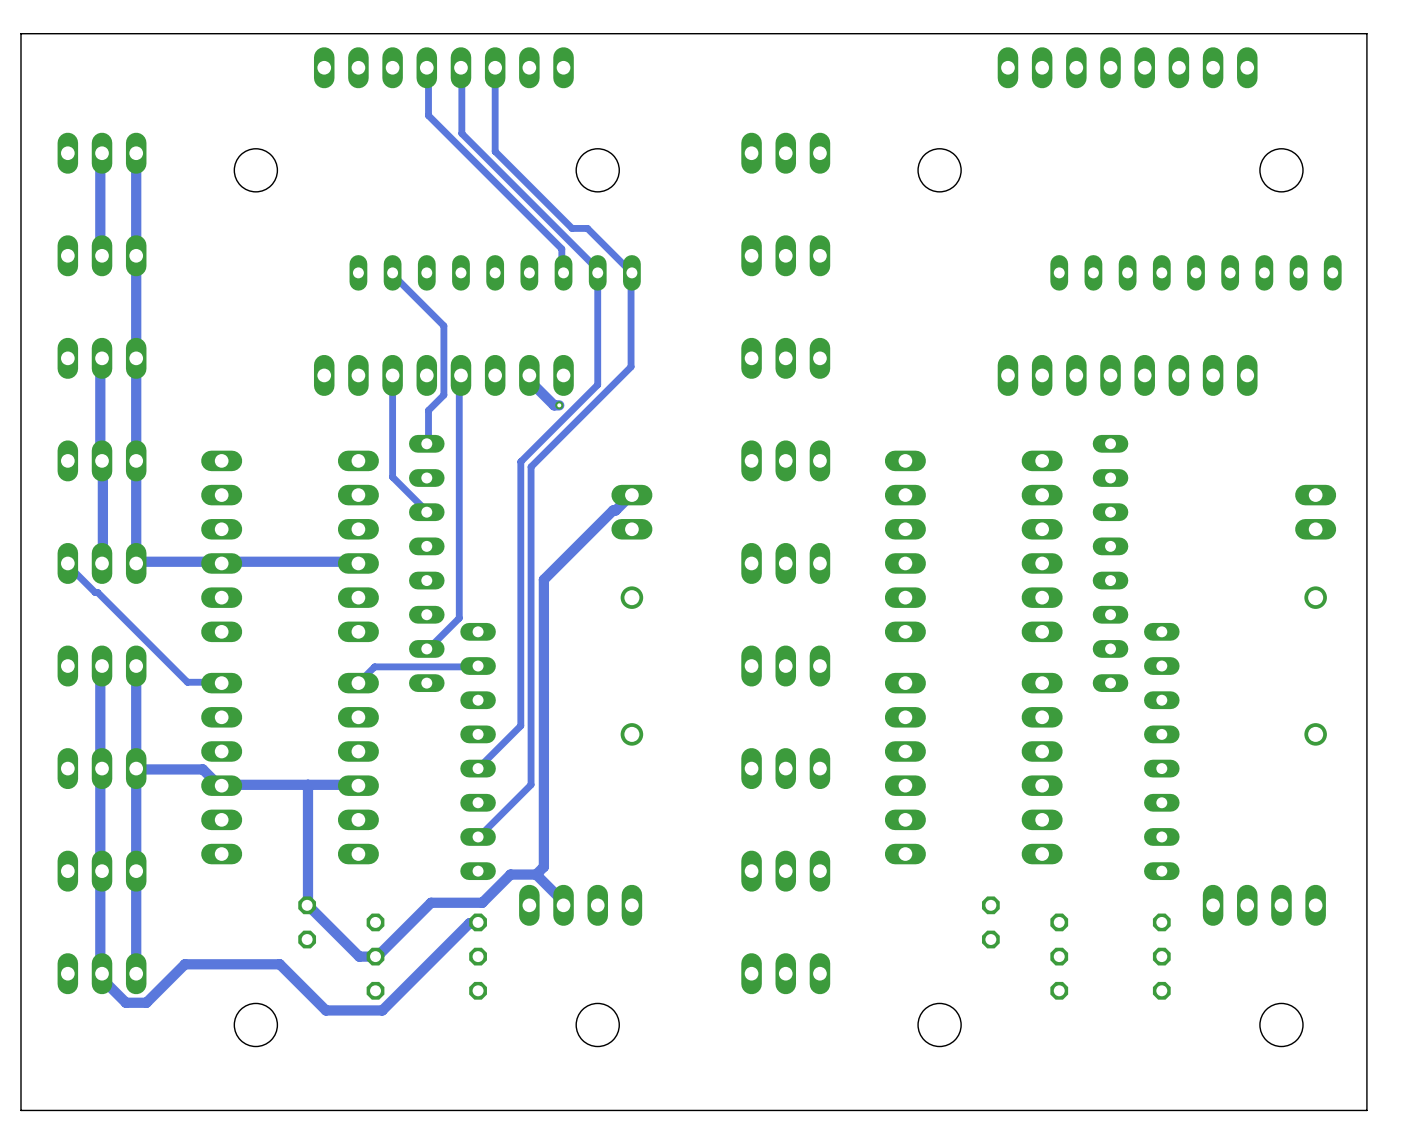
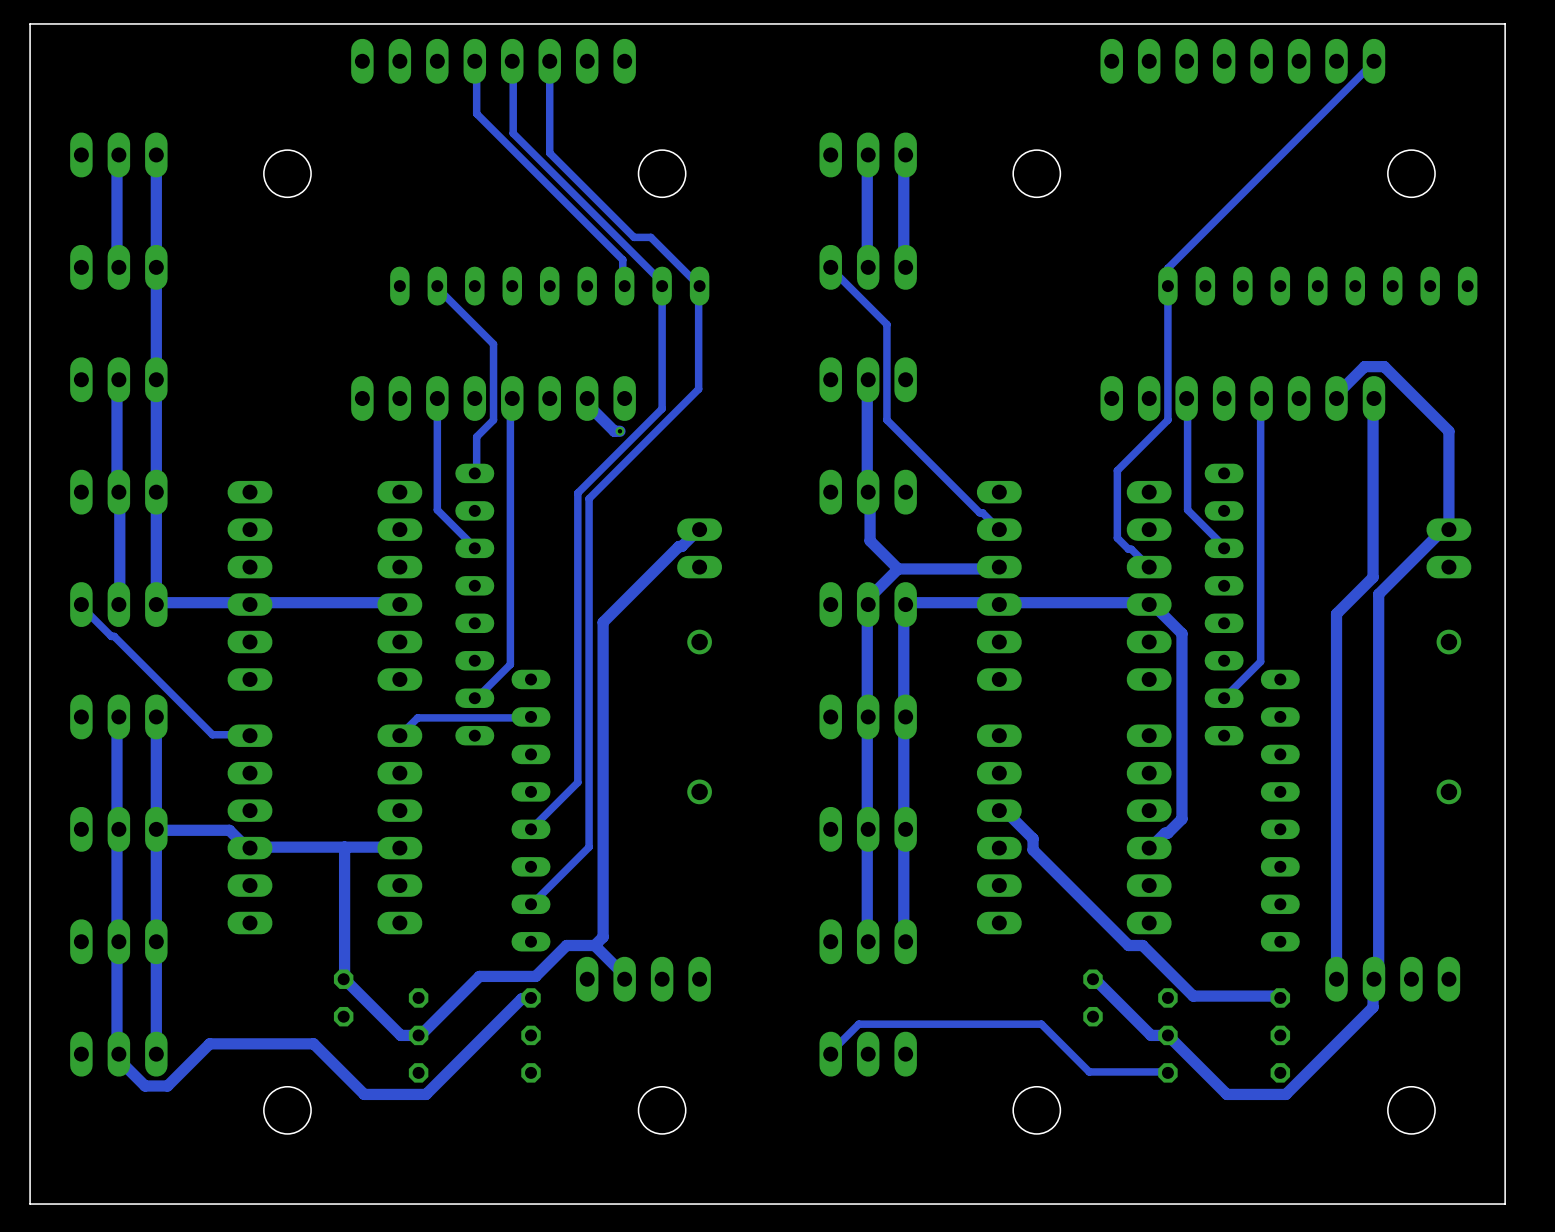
track: none -> (1373, 61) (1167, 268) (1167, 420) (1117, 470) (1117, 538) (1149, 567)
track: none -> (868, 154) (868, 267)
track: none -> (905, 154) (903, 155) (903, 265) (905, 267)
track: none -> (830, 267) (886, 324) (886, 420) (979, 512) (982, 512) (999, 529)
track: none -> (868, 379) (867, 487) (870, 493) (870, 540) (898, 568)
track: none -> (1186, 398) (1187, 509) (1224, 548)
track: none -> (1261, 398) (1260, 661) (1224, 698)
track: none -> (1336, 398) (1336, 394) (1364, 366) (1384, 366) (1448, 431) (1448, 529) (1446, 532) (1440, 532) (1378, 594) (1378, 976) (1373, 979) (1373, 1007) (1285, 1094) (1226, 1094) (1167, 1035) (1151, 1035) (1092, 979)
track: none -> (1373, 398) (1373, 577) (1336, 613) (1336, 979)
track: none -> (999, 567) (999, 568) (898, 568)
track: none -> (898, 568) (870, 597) (867, 608) (868, 941)
track: none -> (999, 810) (1004, 810) (1033, 838) (1033, 849) (1128, 945) (1142, 945) (1193, 996) (1280, 996) (1280, 997)
track: none -> (1149, 848) (1181, 819) (1181, 633) (1151, 602) (1149, 604) (1145, 602) (1002, 602) (999, 604) (999, 602) (909, 602) (903, 605) (903, 715) (905, 716) (903, 720) (903, 827) (905, 829) (903, 833) (903, 939) (905, 941)
track: none -> (830, 1054) (858, 1024) (1041, 1024) (1089, 1071) (1167, 1072)

